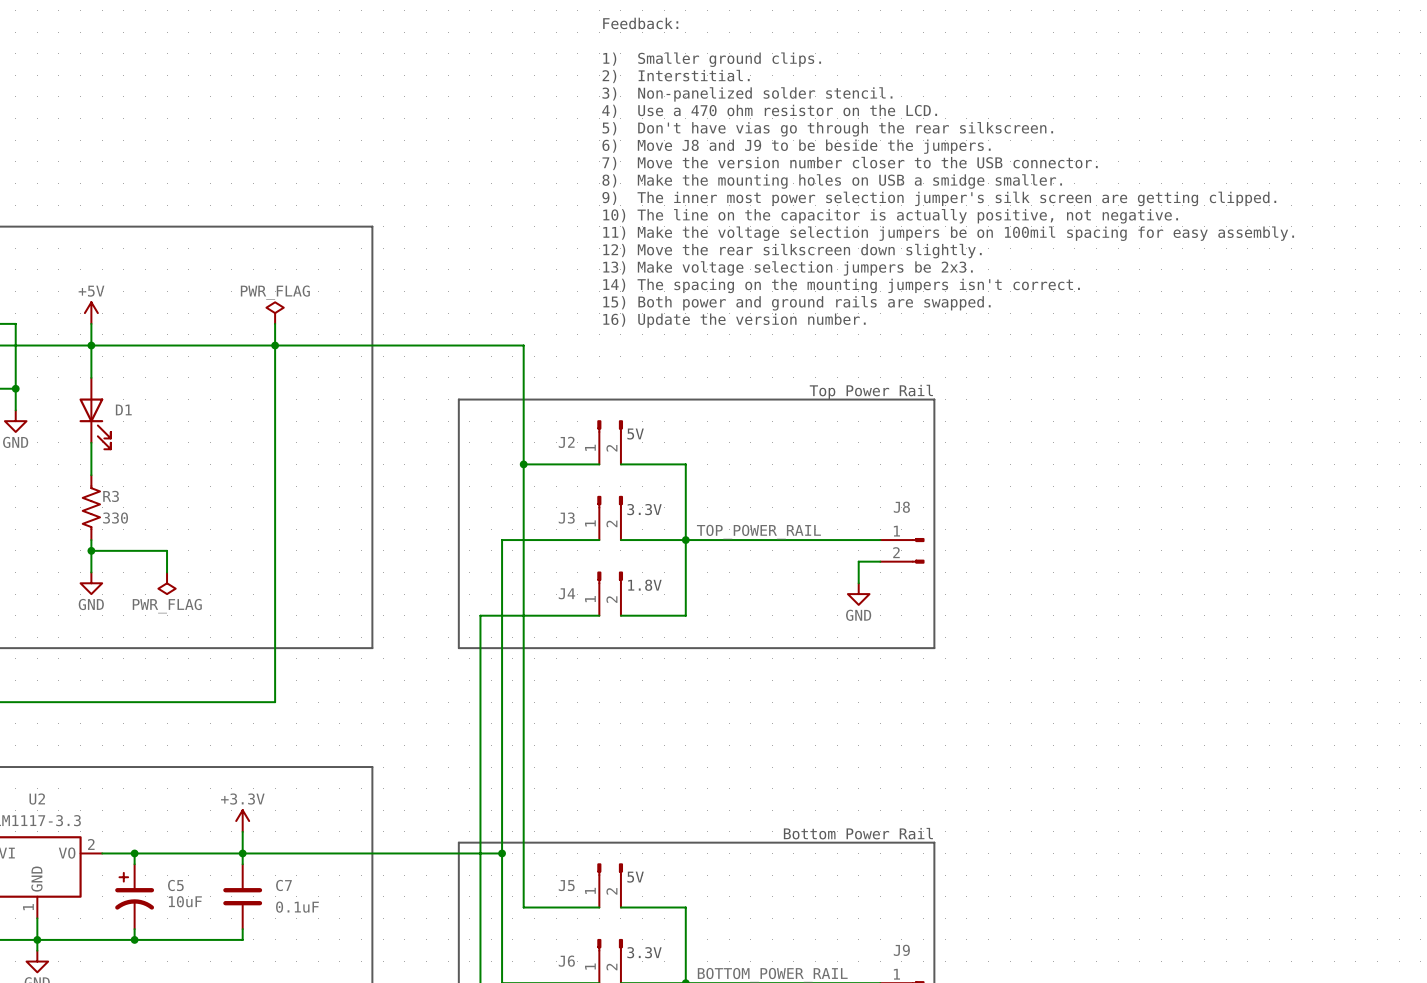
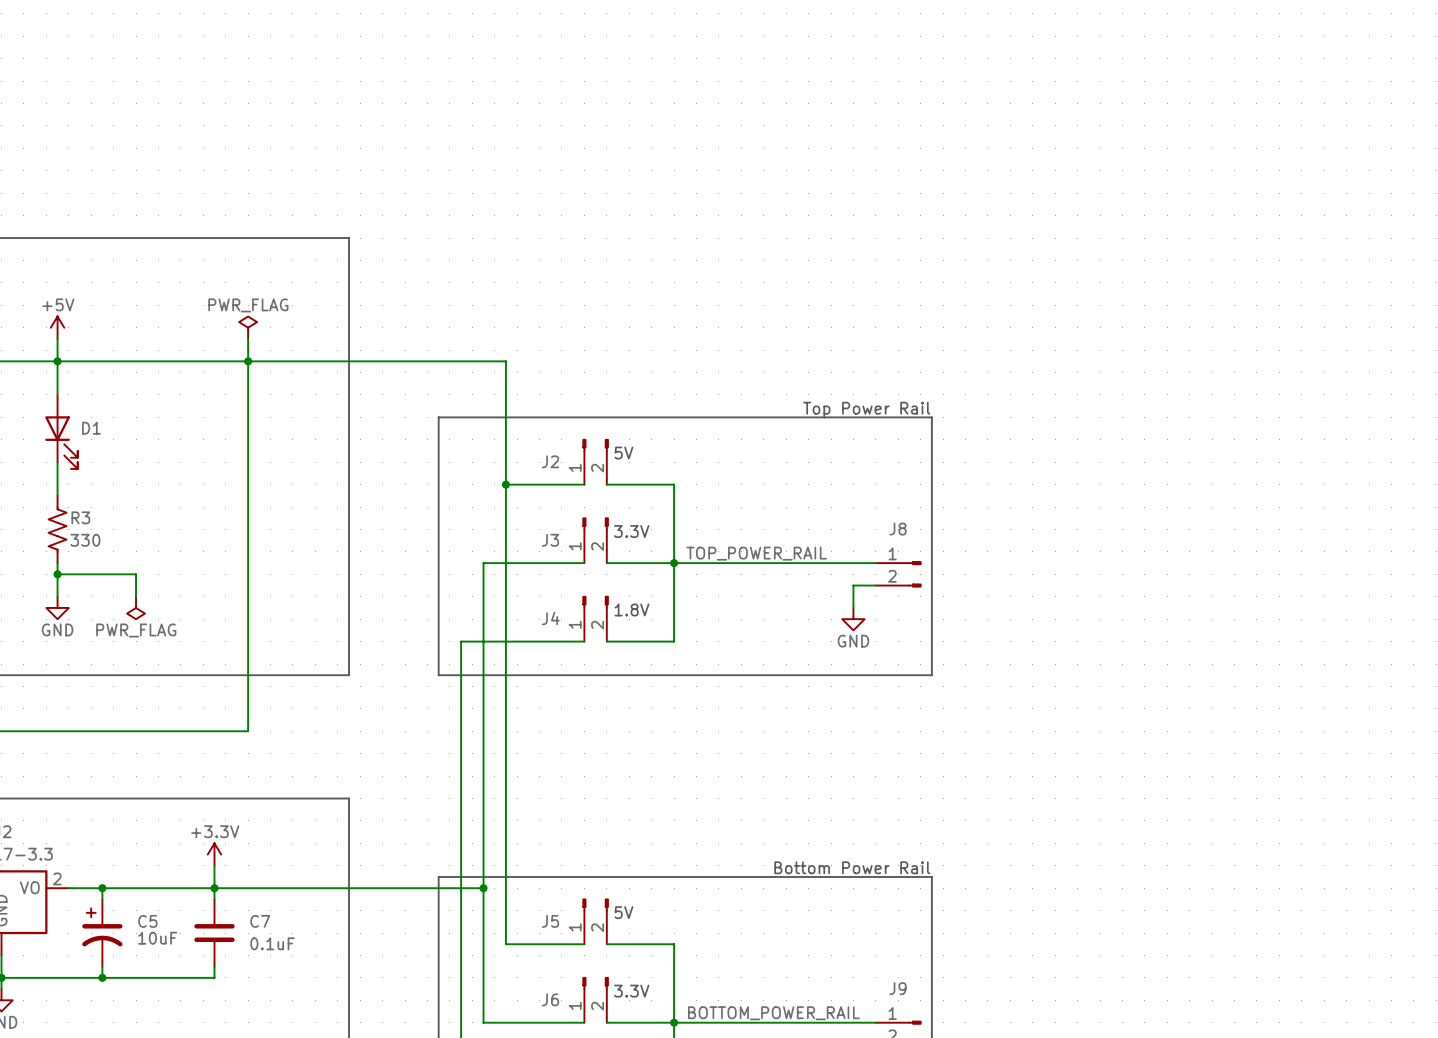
text: Feedback: (640, 23) -> none
text: 1) Smaller ground clips. (712, 59) -> none
text: 2) Interstitial. (676, 76) -> none
text: 3) Non-panelized solder stencil. (747, 94) -> none
text: 4) Use a 470 ohm resistor on the LCD. (769, 111) -> none
text: 5) Don't have vias go through the rear silkscreen. (827, 129) -> none
text: 6) Move J8 and J9 to be beside the jumpers. (796, 146) -> none
text: 7) Move the version number closer to the USB connector. (850, 163) -> none
text: 8) Make the mounting holes on USB a smidge smaller. (832, 181) -> none
text: 9) The inner most power selection jumper's silk screen are getting clipped. (939, 198) -> none
text: 10) The line on the capacitor is actually positive, not negative. (890, 216) -> none
text: 11) Make the voltage selection jumpers be on 100mil spacing for easy assembly. (948, 233) -> none
text: 12) Move the rear silkscreen down slightly. (792, 251) -> none
text: 13) Make voltage selection jumpers be 2x3. (788, 268) -> none
text: 14) The spacing on the mounting jumpers isn't correct. (841, 285) -> none
text: 15) Both power and ground rails are swapped. (796, 303) -> none
text: 16) Update the version number. (734, 320) -> none

